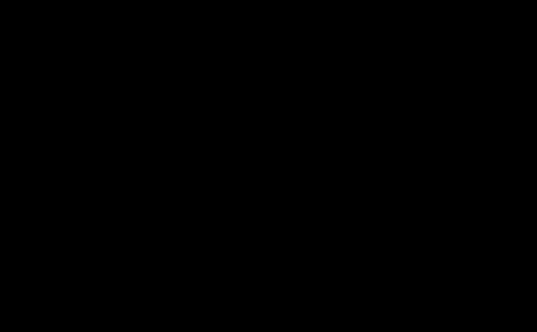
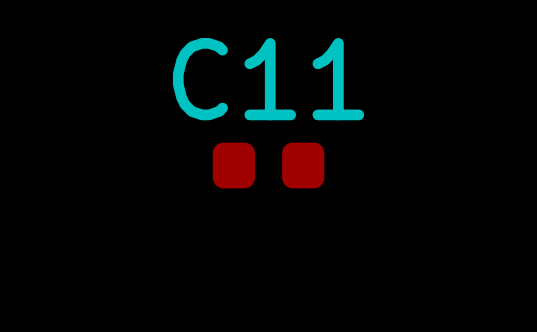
C11: none -> (268, 165)

